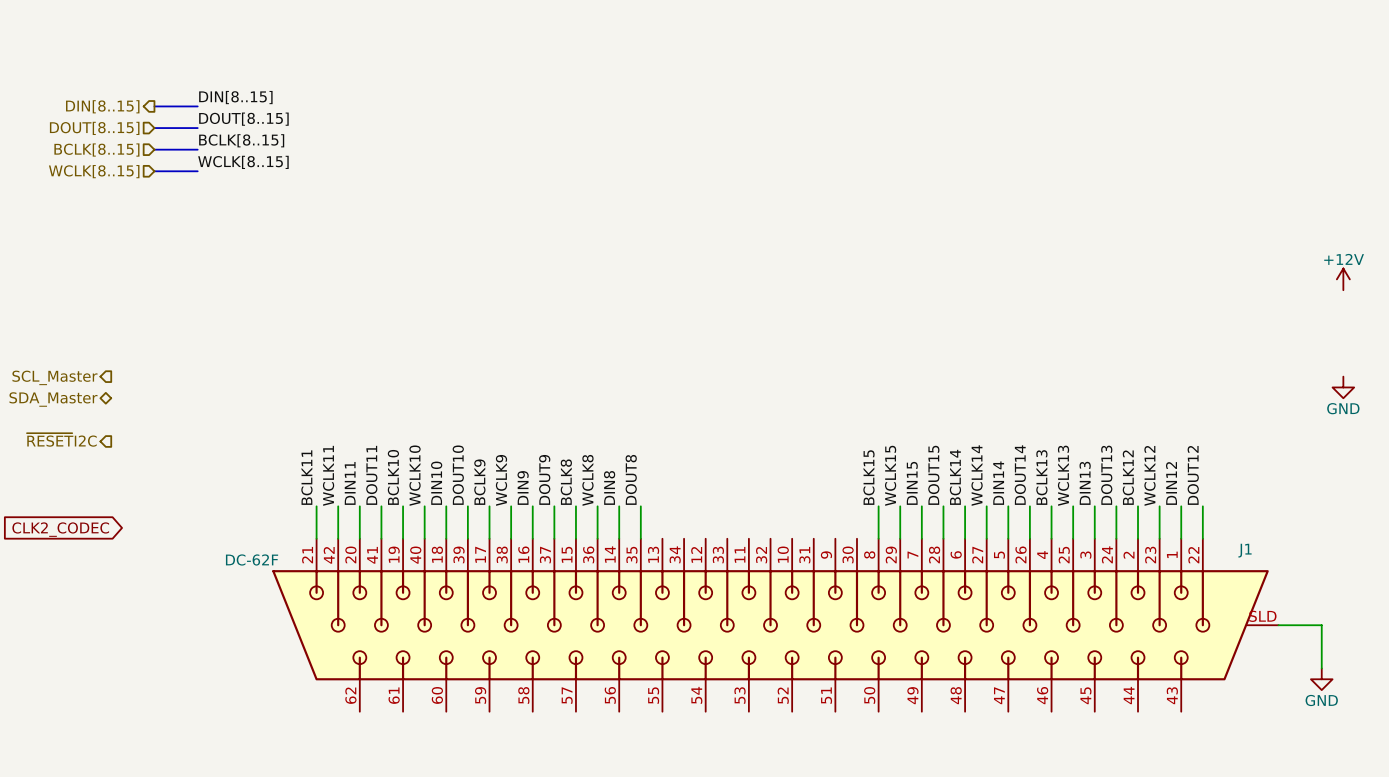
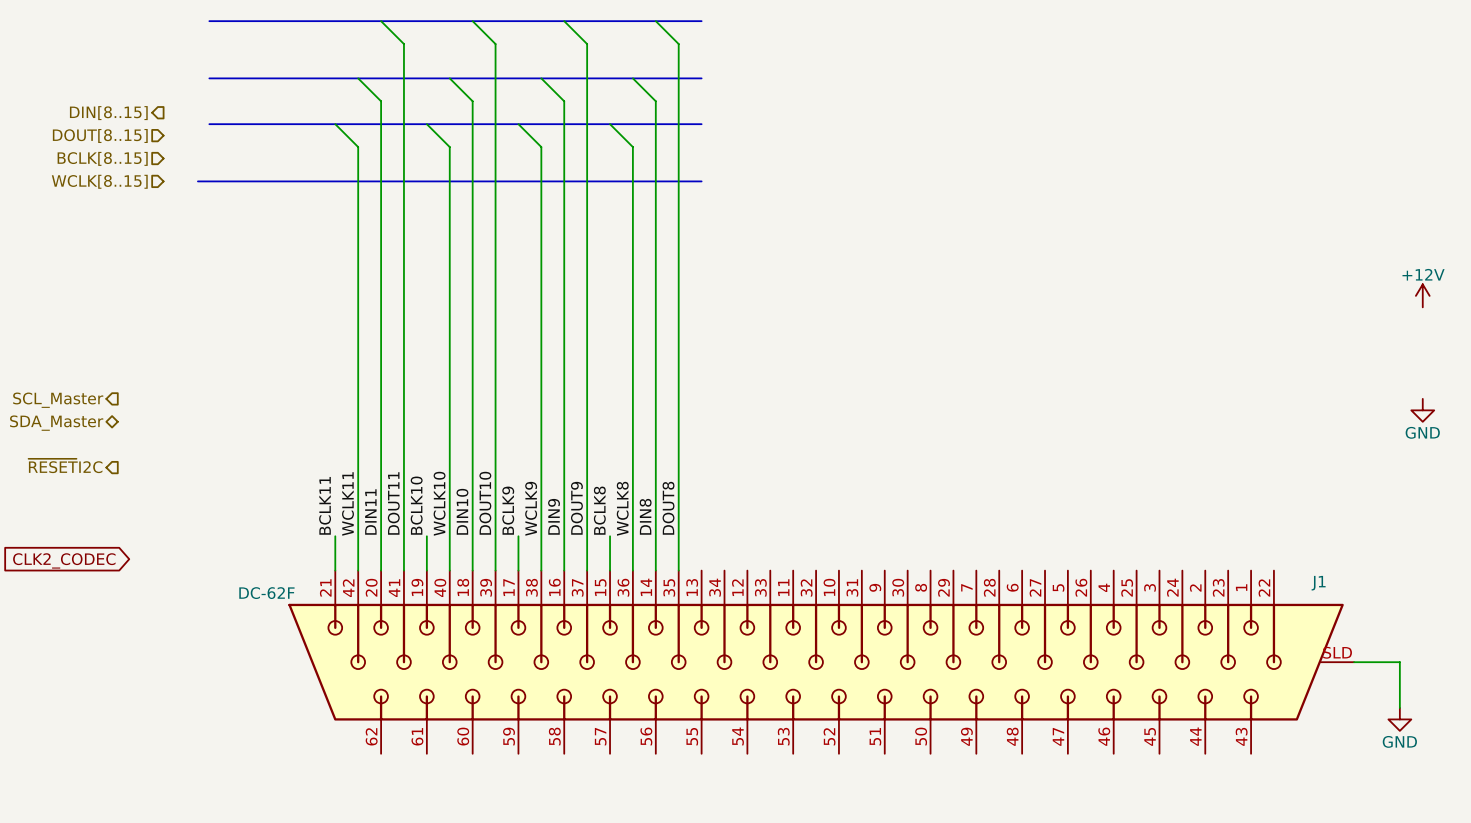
bus: none -> (209, 21) (701, 21)
wire: none -> (381, 21) (403, 44) (403, 536)
wire: none -> (472, 21) (495, 44) (495, 536)
wire: none -> (564, 21) (587, 44) (587, 536)
wire: none -> (655, 21) (678, 44) (678, 536)
bus: none -> (209, 78) (701, 78)
wire: none -> (358, 78) (381, 101) (381, 536)
wire: none -> (449, 78) (472, 101) (472, 536)
wire: none -> (541, 78) (564, 101) (564, 536)
wire: none -> (632, 78) (655, 101) (655, 536)
label: DIN[8..15] (235, 97) -> none
bus: (154, 106) (197, 106) -> none
bus: none -> (209, 124) (701, 124)
wire: none -> (335, 124) (358, 147) (358, 536)
wire: none -> (426, 124) (449, 147) (449, 536)
wire: none -> (518, 124) (541, 147) (541, 536)
wire: none -> (610, 124) (632, 147) (632, 536)
label: DOUT[8..15] (243, 119) -> none
bus: (154, 128) (197, 128) -> none
label: BCLK[8..15] (241, 140) -> none
bus: (154, 149) (197, 149) -> none
label: WCLK[8..15] (243, 162) -> none
bus: (154, 171) (186, 171) -> none
bus: none -> (209, 181) (701, 181)
label: WCLK15 (890, 475) -> none
label: DOUT15 (933, 475) -> none
label: WCLK14 (977, 475) -> none
label: DOUT14 (1020, 475) -> none
label: WCLK13 (1063, 475) -> none
label: DOUT13 (1106, 475) -> none
label: WCLK12 (1149, 475) -> none
label: DOUT12 (1193, 475) -> none
label: BCLK15 (868, 477) -> none
label: BCLK14 (955, 477) -> none
label: BCLK13 (1041, 477) -> none
label: BCLK12 (1128, 477) -> none
label: DIN15 (912, 483) -> none
label: DIN14 (998, 483) -> none
label: DIN13 (1085, 483) -> none
label: DIN12 (1171, 483) -> none
wire: (878, 506) (878, 538) -> none
wire: (900, 506) (900, 538) -> none
wire: (921, 506) (921, 538) -> none
wire: (943, 506) (943, 538) -> none
wire: (965, 506) (965, 538) -> none
wire: (986, 506) (986, 538) -> none
wire: (1008, 506) (1008, 538) -> none
wire: (1029, 506) (1029, 538) -> none
wire: (1051, 506) (1051, 538) -> none
wire: (1073, 506) (1073, 538) -> none
wire: (1094, 506) (1094, 538) -> none
wire: (1116, 506) (1116, 538) -> none
wire: (1138, 506) (1138, 538) -> none
wire: (1159, 506) (1159, 538) -> none
wire: (1181, 506) (1181, 538) -> none
wire: (1202, 506) (1202, 538) -> none

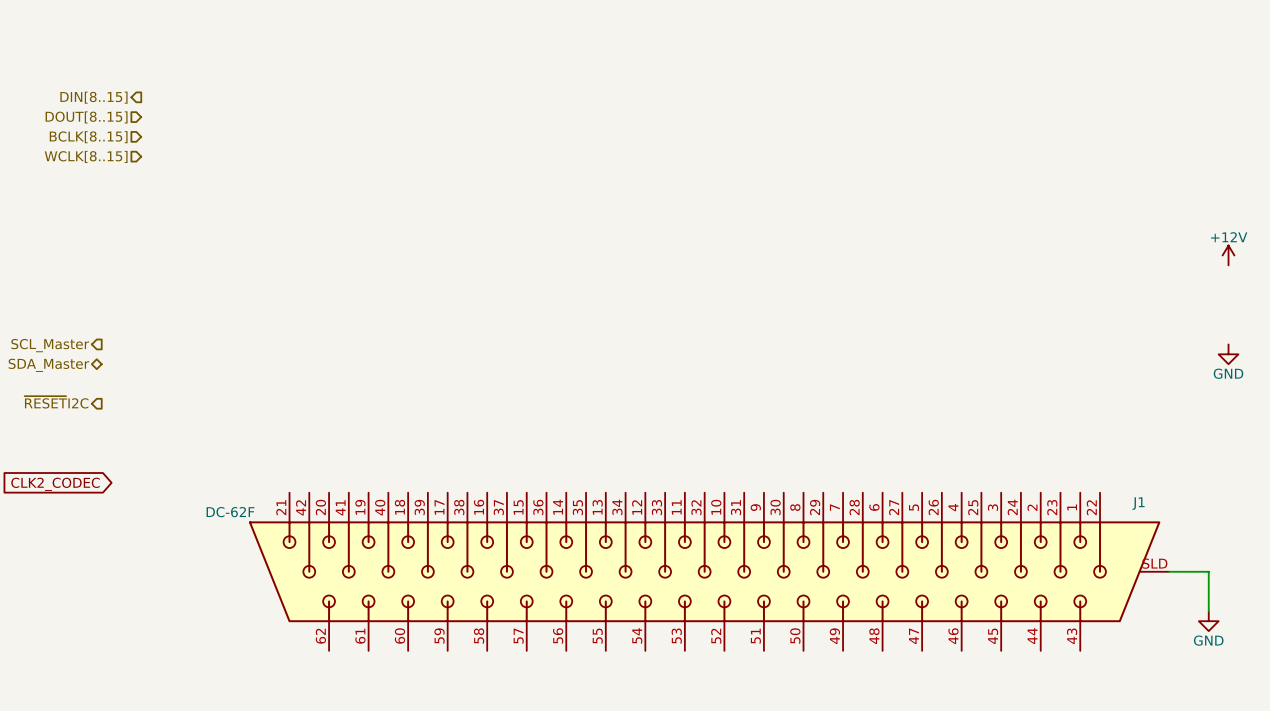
bus: (209, 21) (701, 21) -> none
wire: (381, 21) (403, 44) (403, 570) -> none
wire: (472, 21) (495, 44) (495, 570) -> none
wire: (564, 21) (587, 44) (587, 570) -> none
wire: (655, 21) (678, 44) (678, 570) -> none
bus: (209, 78) (701, 78) -> none
wire: (358, 78) (381, 101) (381, 570) -> none
wire: (449, 78) (472, 101) (472, 570) -> none
wire: (541, 78) (564, 101) (564, 570) -> none
wire: (632, 78) (655, 101) (655, 570) -> none
bus: (209, 124) (701, 124) -> none
wire: (335, 124) (358, 147) (358, 570) -> none
wire: (426, 124) (449, 147) (449, 570) -> none
wire: (518, 124) (541, 147) (541, 570) -> none
wire: (610, 124) (632, 147) (632, 570) -> none
bus: (197, 181) (701, 181) -> none
label: WCLK11 (347, 503) -> none
label: DOUT11 (393, 503) -> none
label: WCLK10 (439, 503) -> none
label: DOUT10 (485, 503) -> none
label: BCLK11 (325, 505) -> none
label: BCLK10 (416, 505) -> none
label: WCLK9 (531, 508) -> none
label: DOUT9 (576, 508) -> none
label: WCLK8 (622, 508) -> none
label: DOUT8 (668, 508) -> none
label: BCLK9 (508, 510) -> none
label: BCLK8 (599, 510) -> none
label: DIN10 (462, 511) -> none
label: DIN11 (370, 512) -> none
label: DIN9 (554, 516) -> none
label: DIN8 (645, 516) -> none
wire: (335, 536) (335, 570) -> none
wire: (426, 536) (426, 570) -> none
wire: (518, 536) (518, 570) -> none
wire: (610, 536) (610, 570) -> none

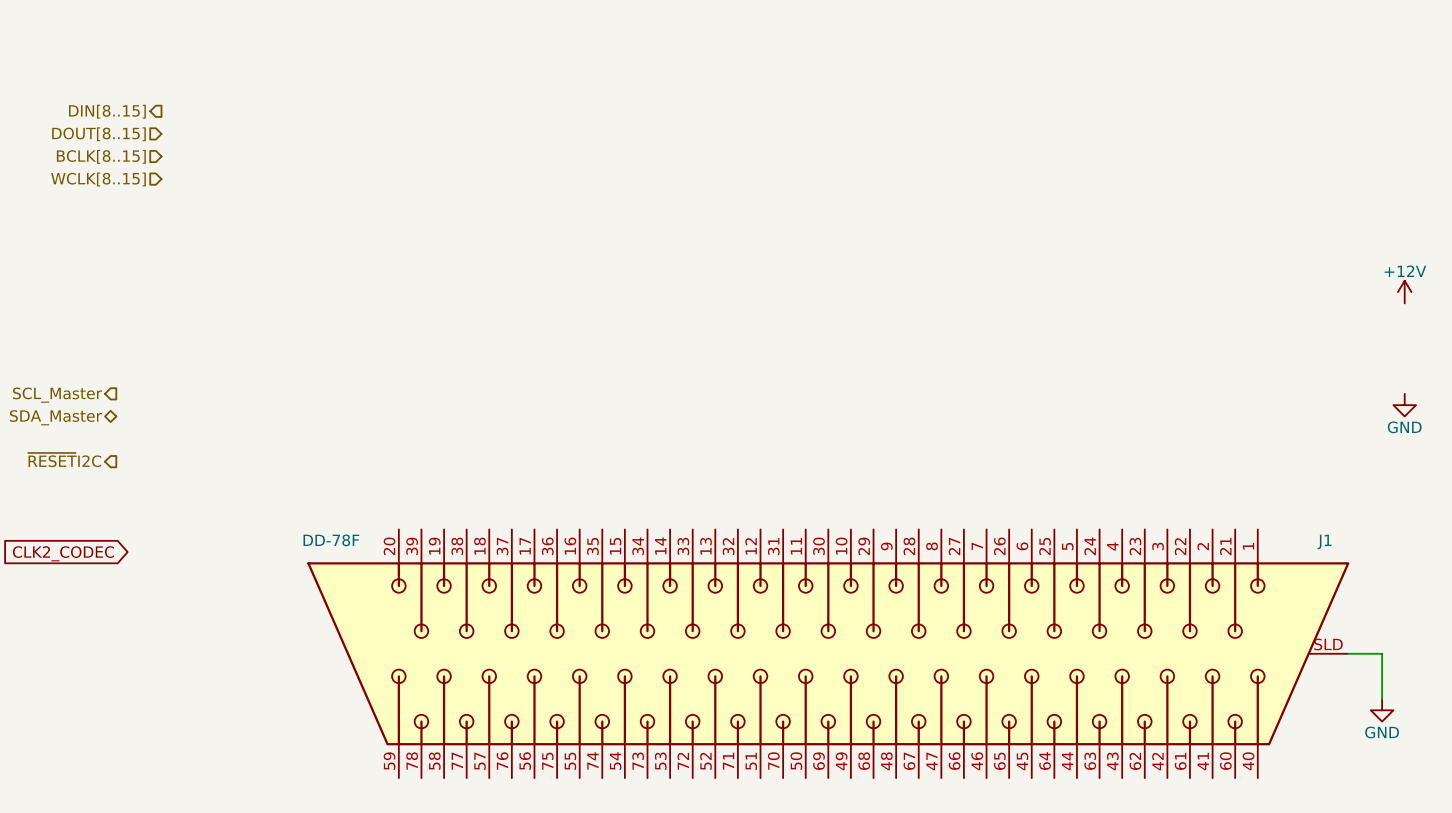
J1 symbol: [248, 492, 1170, 651] -> [307, 529, 1350, 779]
J1 name position: J1 (1138, 503) -> J1 (1324, 541)
J1 value: DC-62F (230, 512) -> DD-78F (331, 540)

